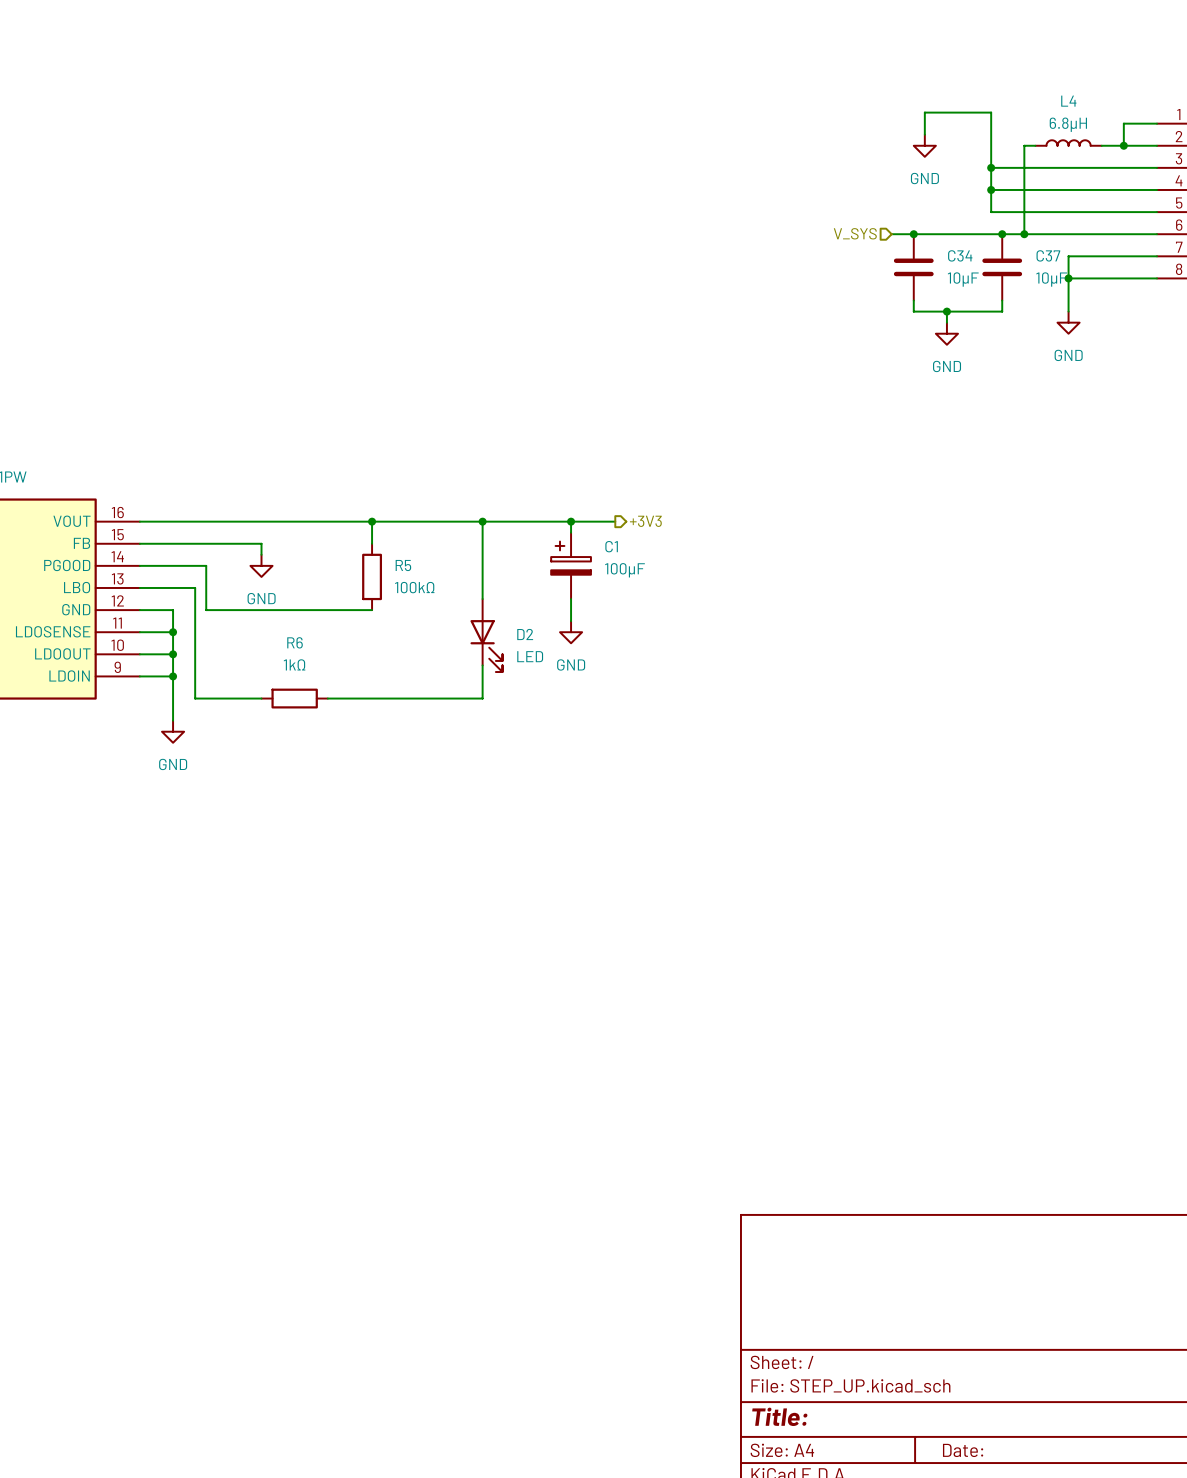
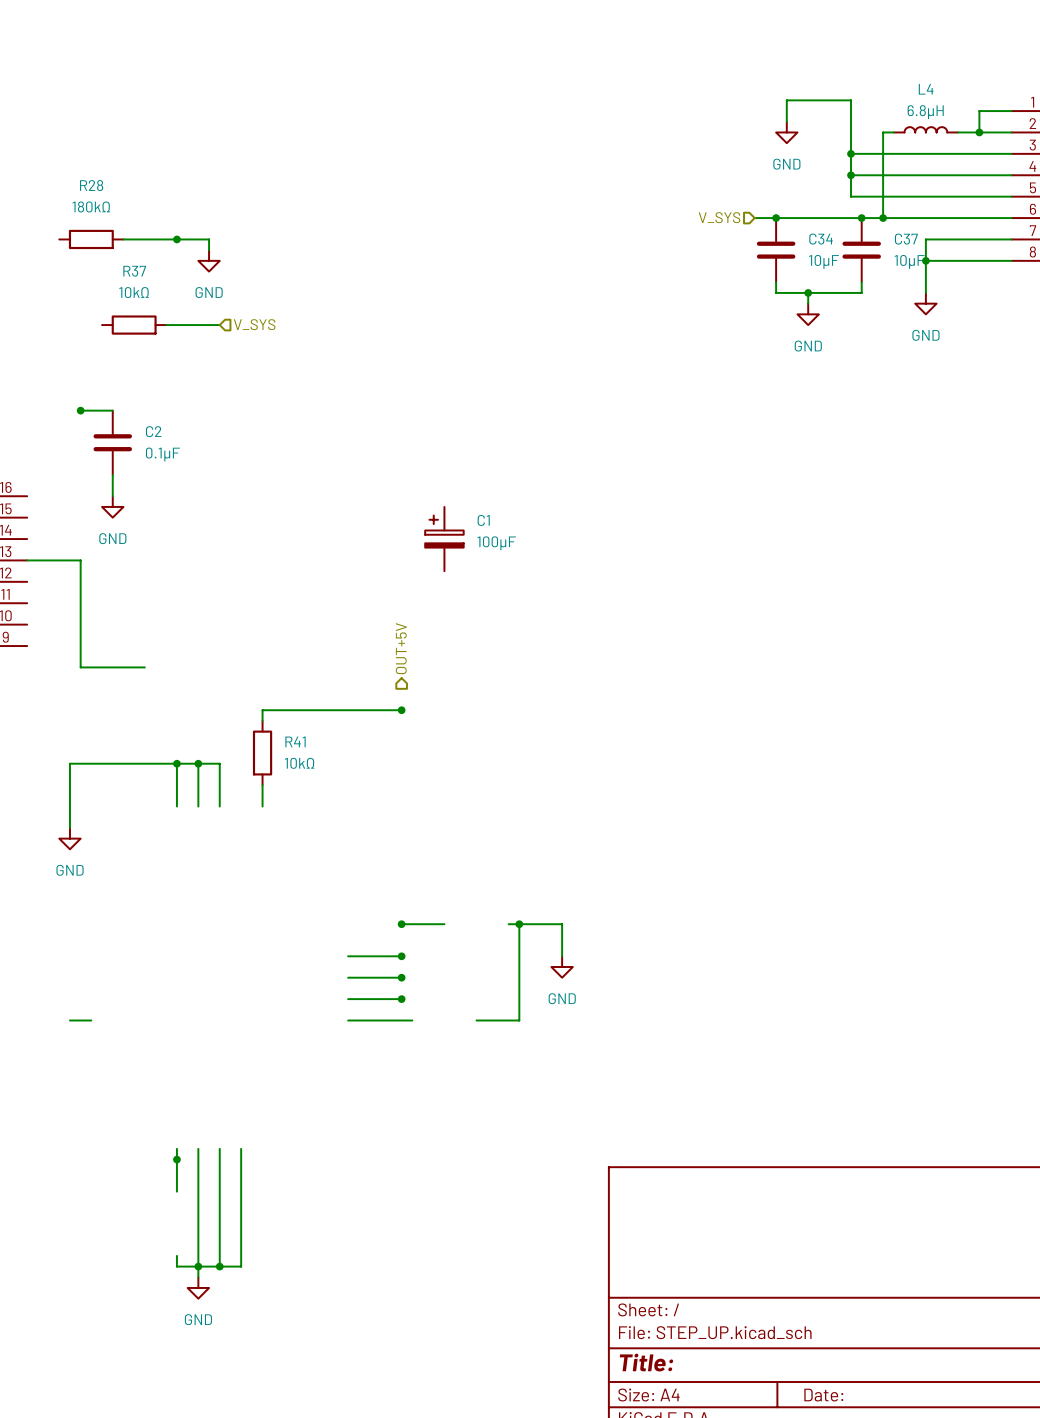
R28: none -> 180kΩ (91, 239)
wire: none -> (123, 239) (209, 239) (209, 250)
junction: none -> (176, 239)
power symbol: none -> GND (209, 260)
R37: none -> 10kΩ (134, 325)
wire: none -> (166, 325) (219, 325)
hierarchical label: none -> V_SYS (254, 324)
junction: none -> (80, 410)
C2: none -> 0.1μF (112, 442)
wire: (139, 521) (615, 521) -> none
wire: (372, 521) (372, 543) -> (112, 474) (112, 496)
junction: (372, 521) -> none
wire: (482, 521) (482, 599) -> none
junction: (482, 521) -> none
wire: (571, 521) (571, 532) -> none
junction: (571, 521) -> none
hierarchical label: +3V3 (645, 521) -> none
wire: (139, 543) (261, 543) (261, 554) -> none
wire: (139, 565) (206, 565) (206, 610) (372, 610) -> none
power symbol position: GND (261, 565) -> GND (112, 506)
R5: 100kΩ (372, 576) -> none
wire: (571, 599) (571, 621) -> none
wire: (139, 610) (173, 610) (173, 720) -> none
wire: (139, 632) (173, 632) -> (80, 410) (112, 410)
junction: (173, 632) -> none
power symbol: GND (571, 632) -> none
D2: LED (486, 635) -> none
wire: (139, 654) (173, 654) -> none
junction: (173, 654) -> none
wire: (482, 665) (482, 698) (327, 698) -> none
wire: (139, 676) (173, 676) -> none
junction: (173, 676) -> none
hierarchical label: none -> OUT+5V (401, 648)
R6: 1kΩ (294, 698) -> none
power symbol: GND (173, 731) -> none
wire: none -> (401, 710) (262, 710) (262, 720)
junction: none -> (401, 710)
R41: none -> 10kΩ (262, 753)
wire: none -> (176, 763) (176, 806)
junction: none -> (176, 763)
wire: none -> (198, 763) (198, 806)
junction: none -> (198, 763)
wire: none -> (262, 785) (262, 806)
wire: none -> (219, 806) (219, 763) (69, 763) (69, 827)
power symbol: none -> GND (69, 838)
wire: none -> (401, 924) (444, 924)
junction: none -> (401, 924)
wire: none -> (508, 924) (562, 924) (562, 956)
wire: none -> (519, 924) (519, 1020) (476, 1020)
junction: none -> (519, 924)
wire: none -> (348, 956) (401, 956)
junction: none -> (401, 956)
power symbol: none -> GND (562, 967)
wire: none -> (348, 977) (401, 977)
junction: none -> (401, 977)
wire: none -> (348, 999) (401, 999)
junction: none -> (401, 999)
wire: none -> (69, 1020) (91, 1020)
wire: none -> (348, 1020) (412, 1020)
wire: none -> (176, 1148) (176, 1191)
wire: none -> (198, 1148) (198, 1277)
wire: none -> (219, 1148) (219, 1266)
wire: none -> (241, 1148) (241, 1266) (176, 1266) (176, 1255)
junction: none -> (176, 1159)
junction: none -> (198, 1266)
junction: none -> (219, 1266)
power symbol: none -> GND (198, 1287)

